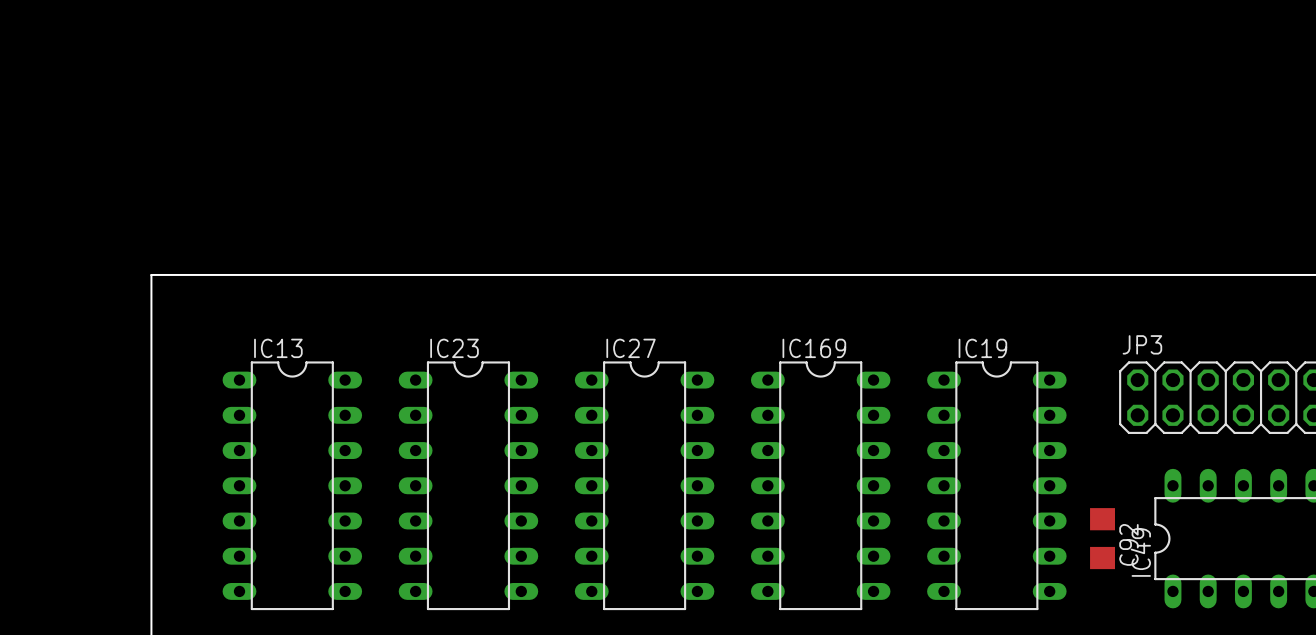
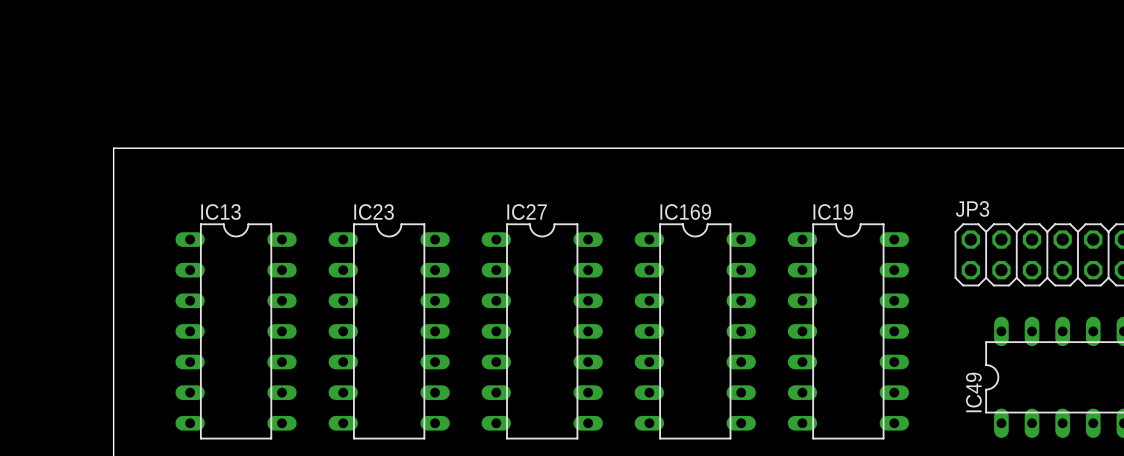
C92: (1102, 538) -> none

